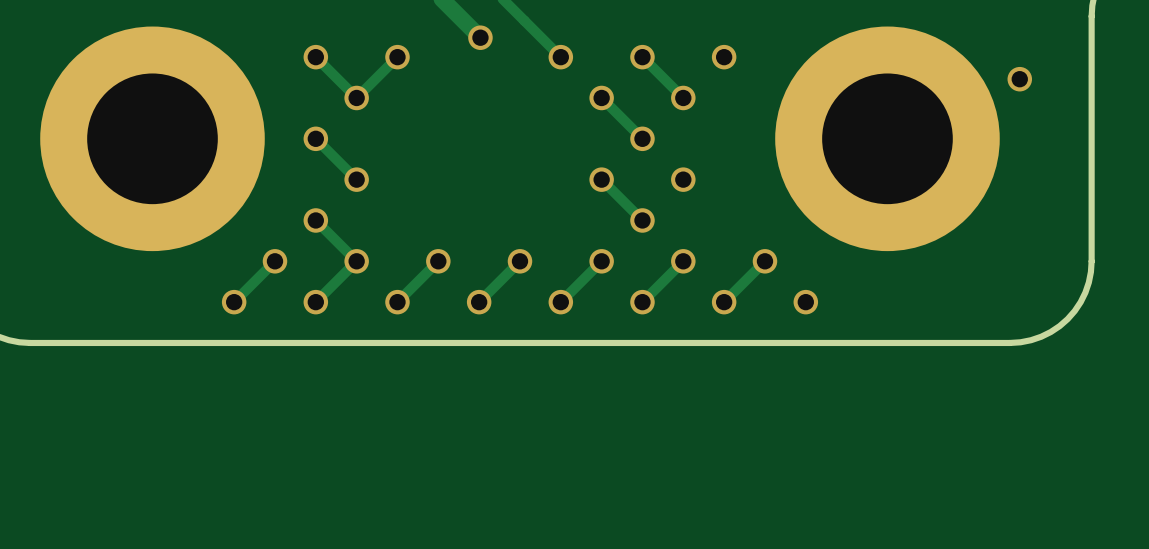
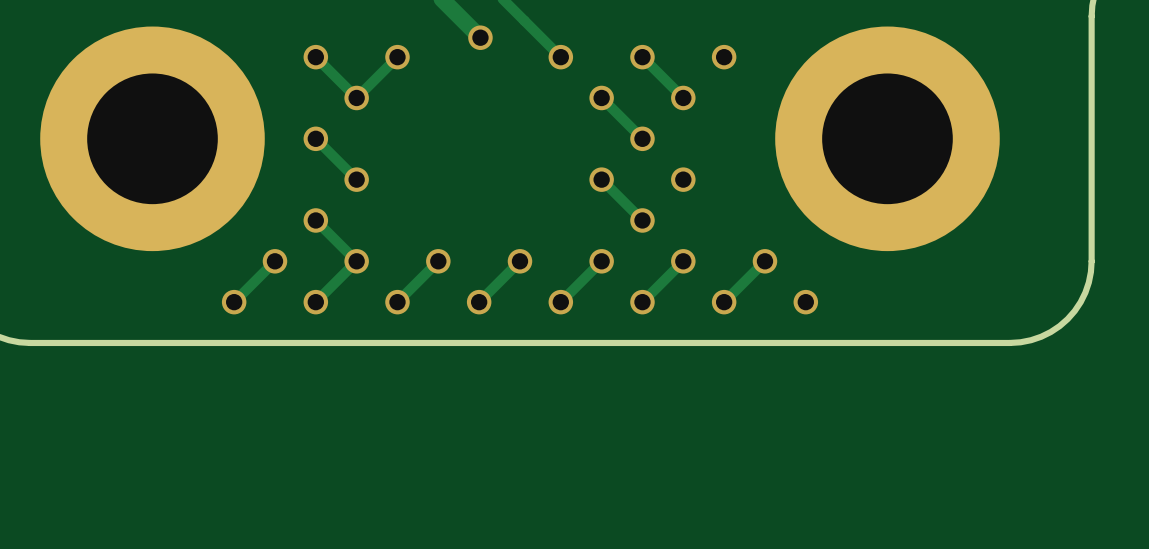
via: (1019, 79) -> none

